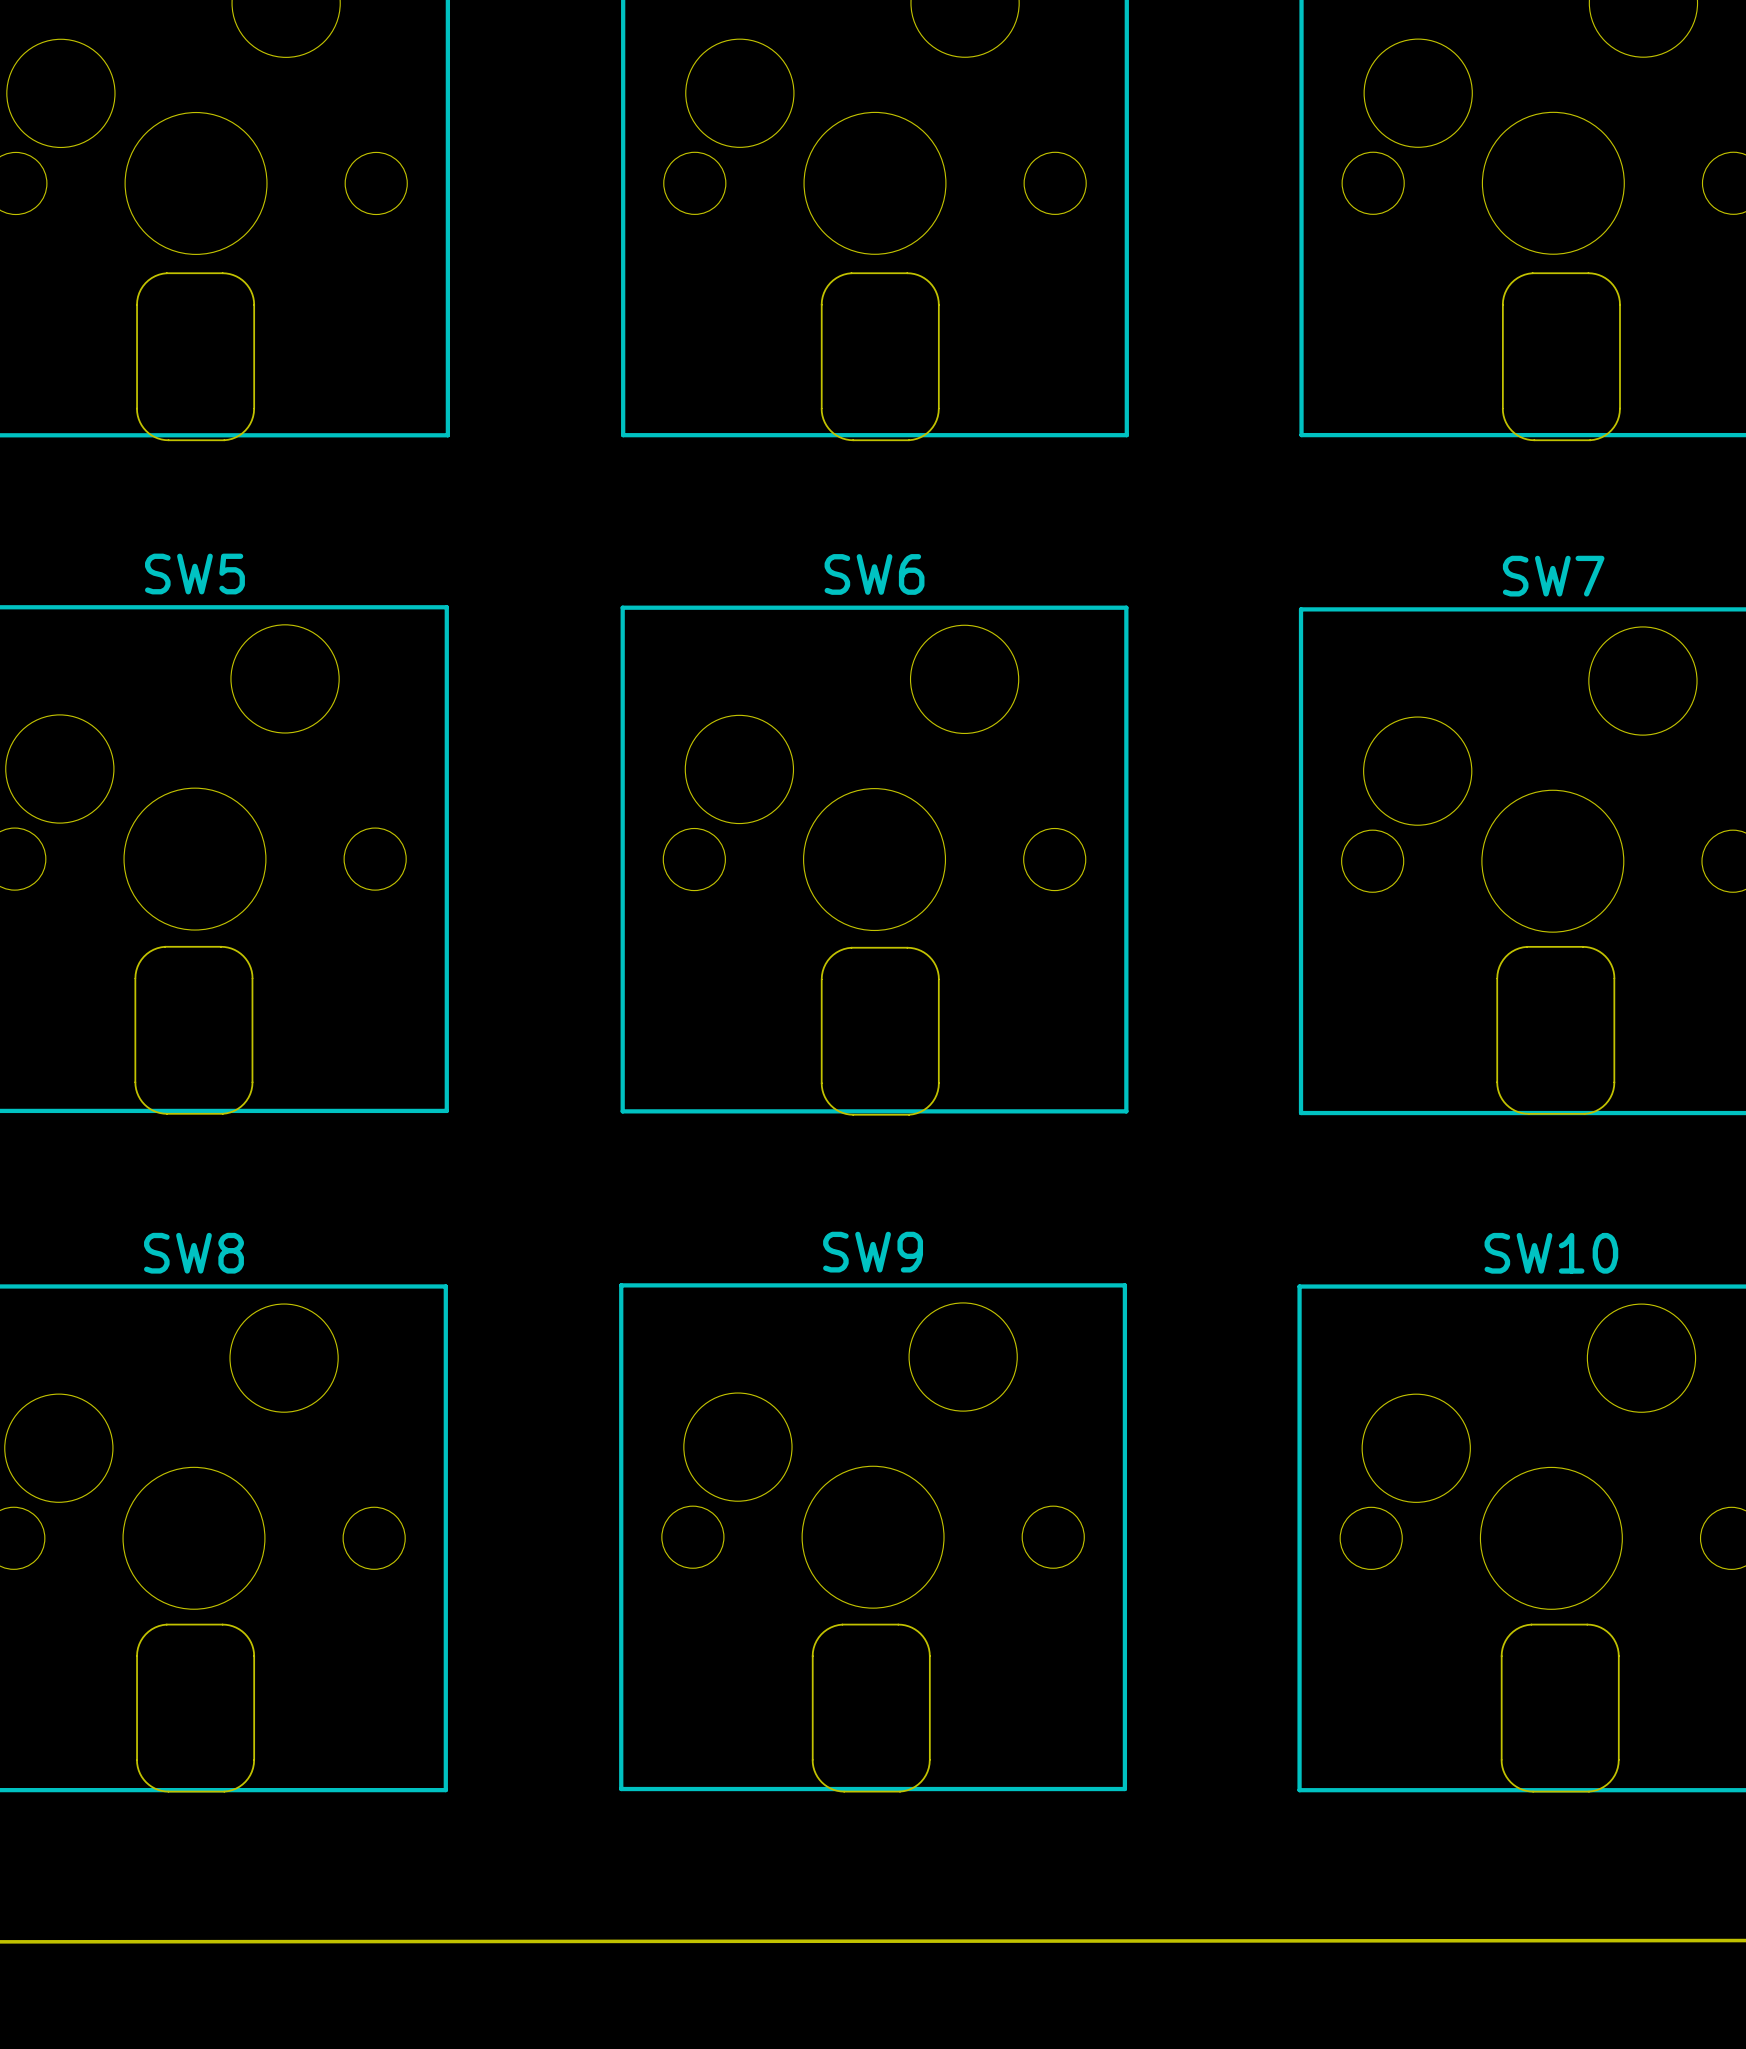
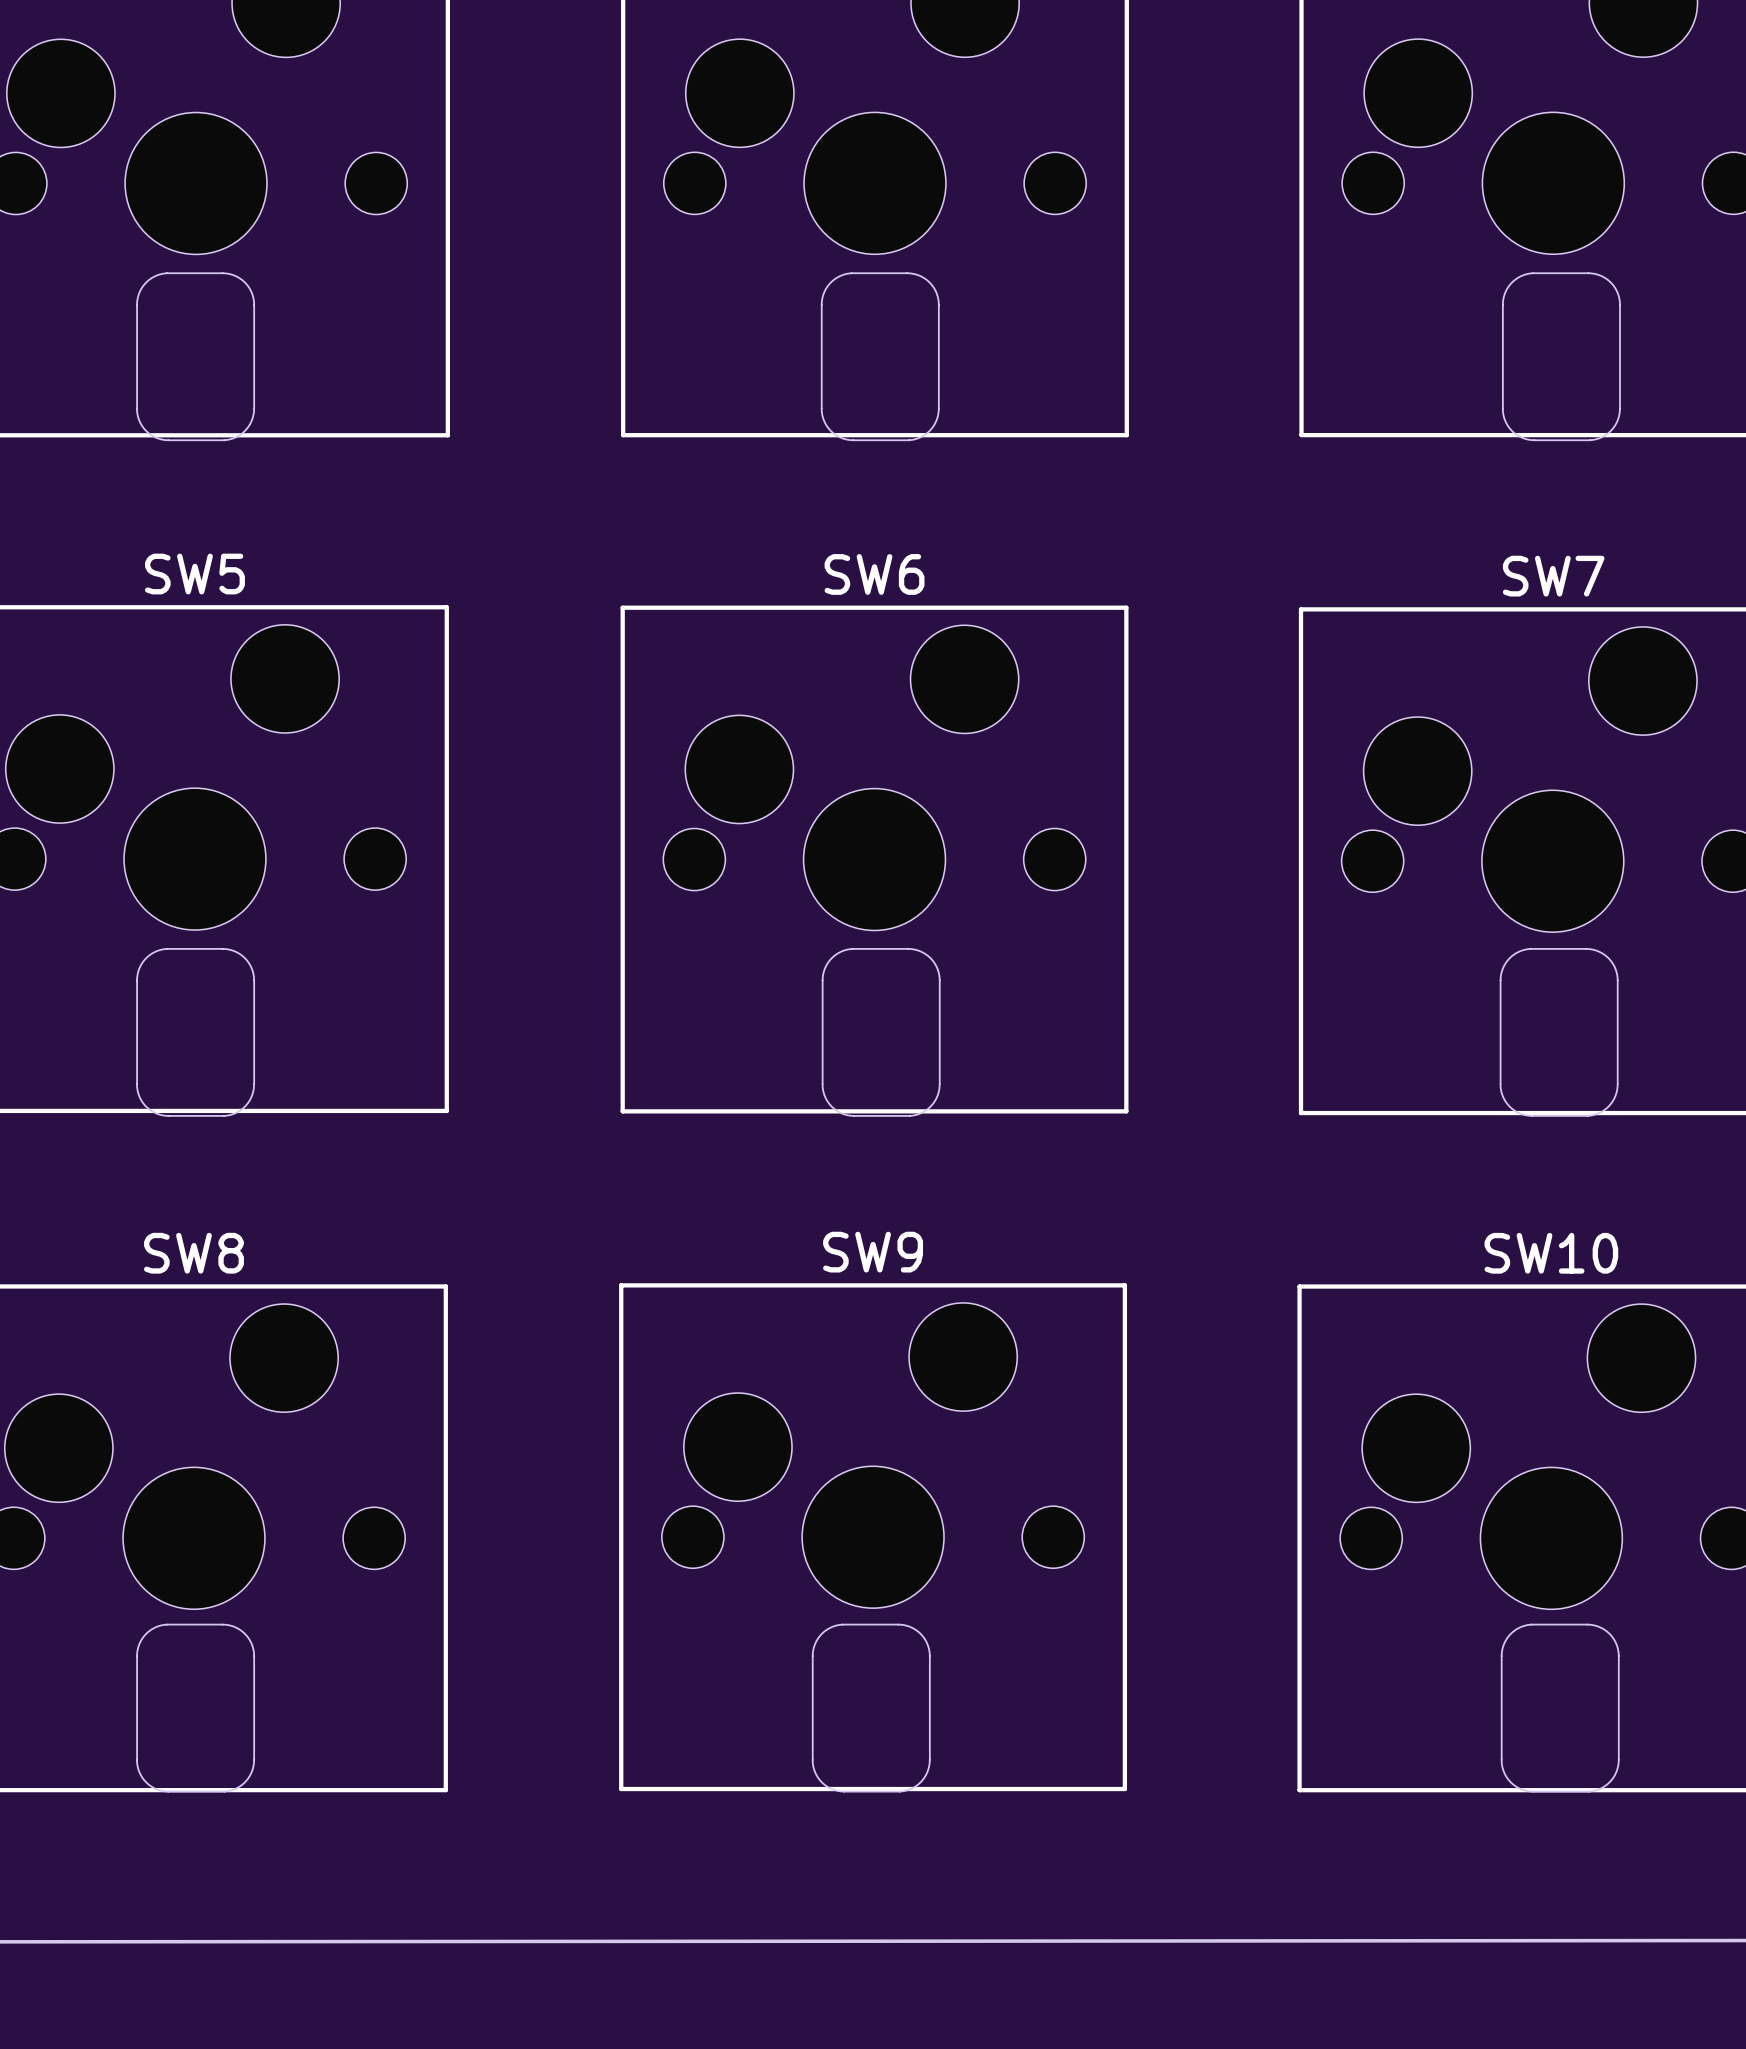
part rotation: 0° (193, 1030) -> 180° (195, 1032)
part rotation: 0° (1555, 1030) -> 180° (1559, 1032)
part rotation: 0° (880, 1031) -> 180° (881, 1032)

